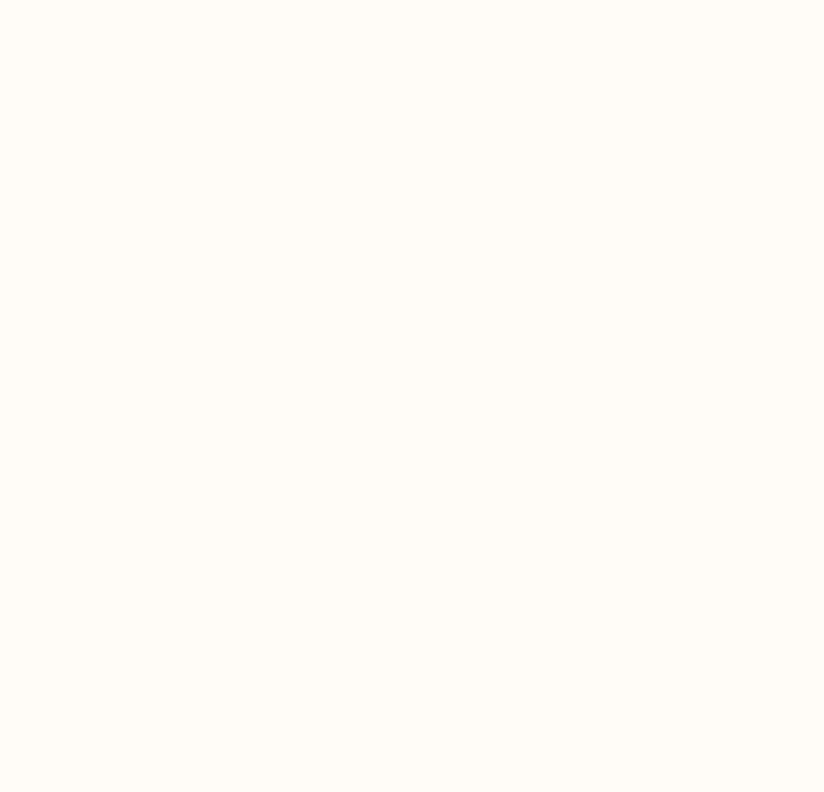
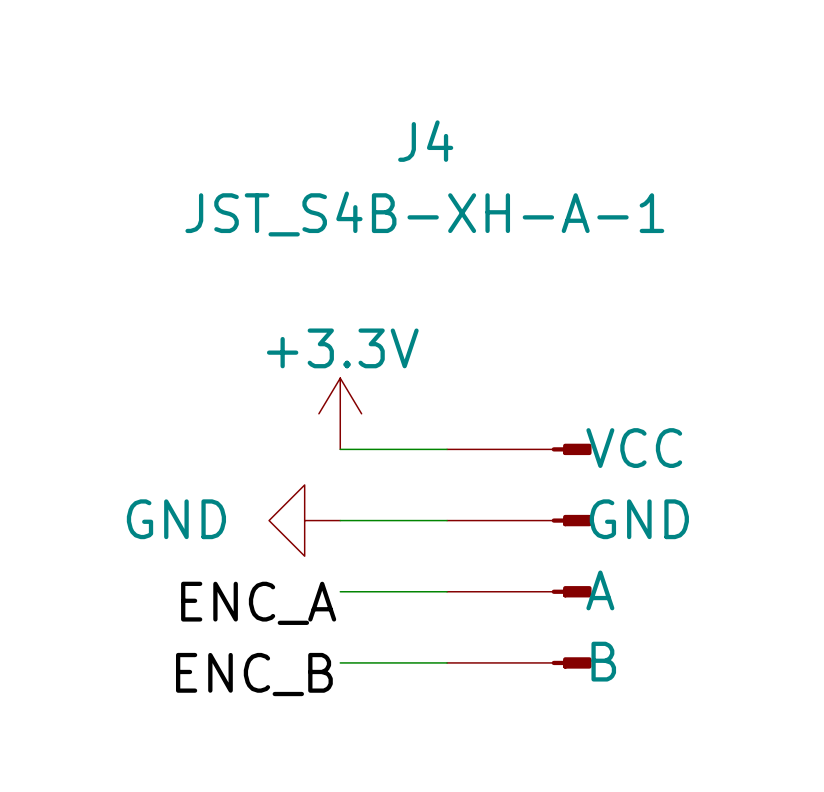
power symbol: none -> +3.3V (340, 413)
wire: none -> (340, 449) (447, 449)
power symbol: none -> GND (304, 520)
wire: none -> (340, 520) (447, 520)
J4: none -> JST_S4B-XH-A-1 (519, 556)
wire: none -> (340, 591) (447, 591)
label: none -> ENC_A (258, 603)
wire: none -> (340, 662) (447, 662)
label: none -> ENC_B (254, 674)

